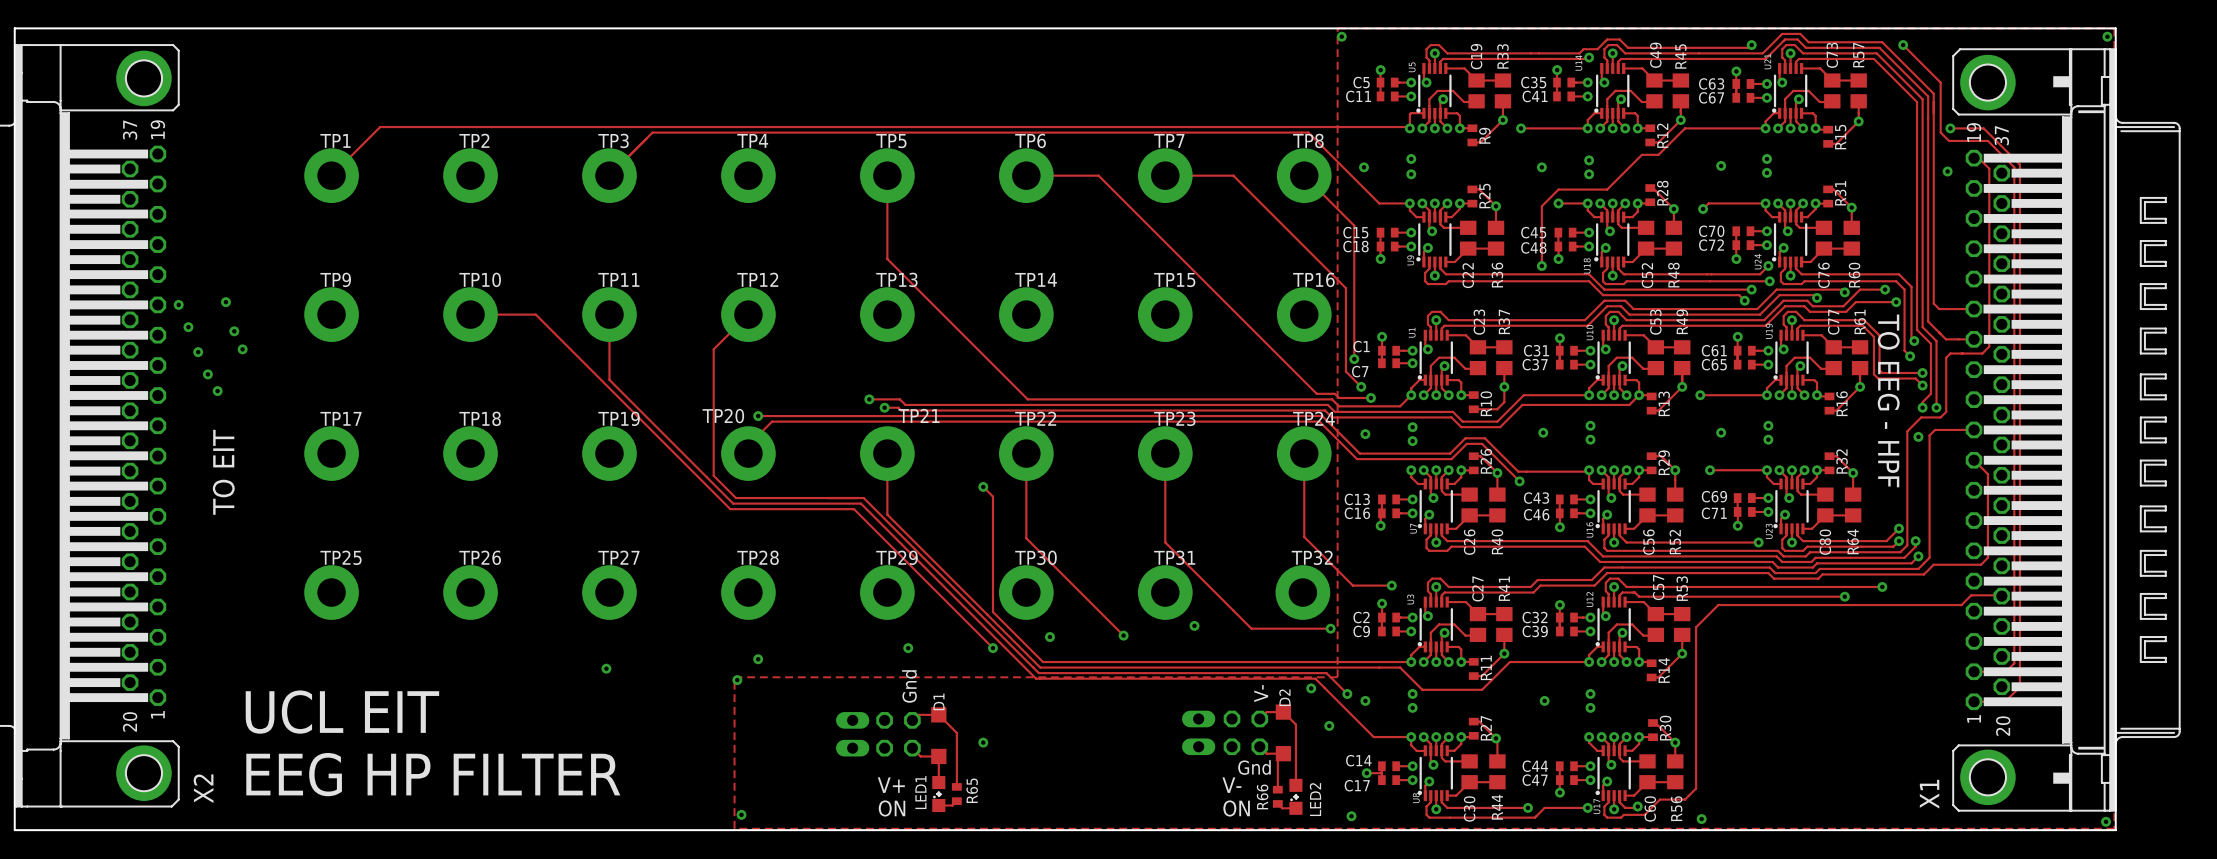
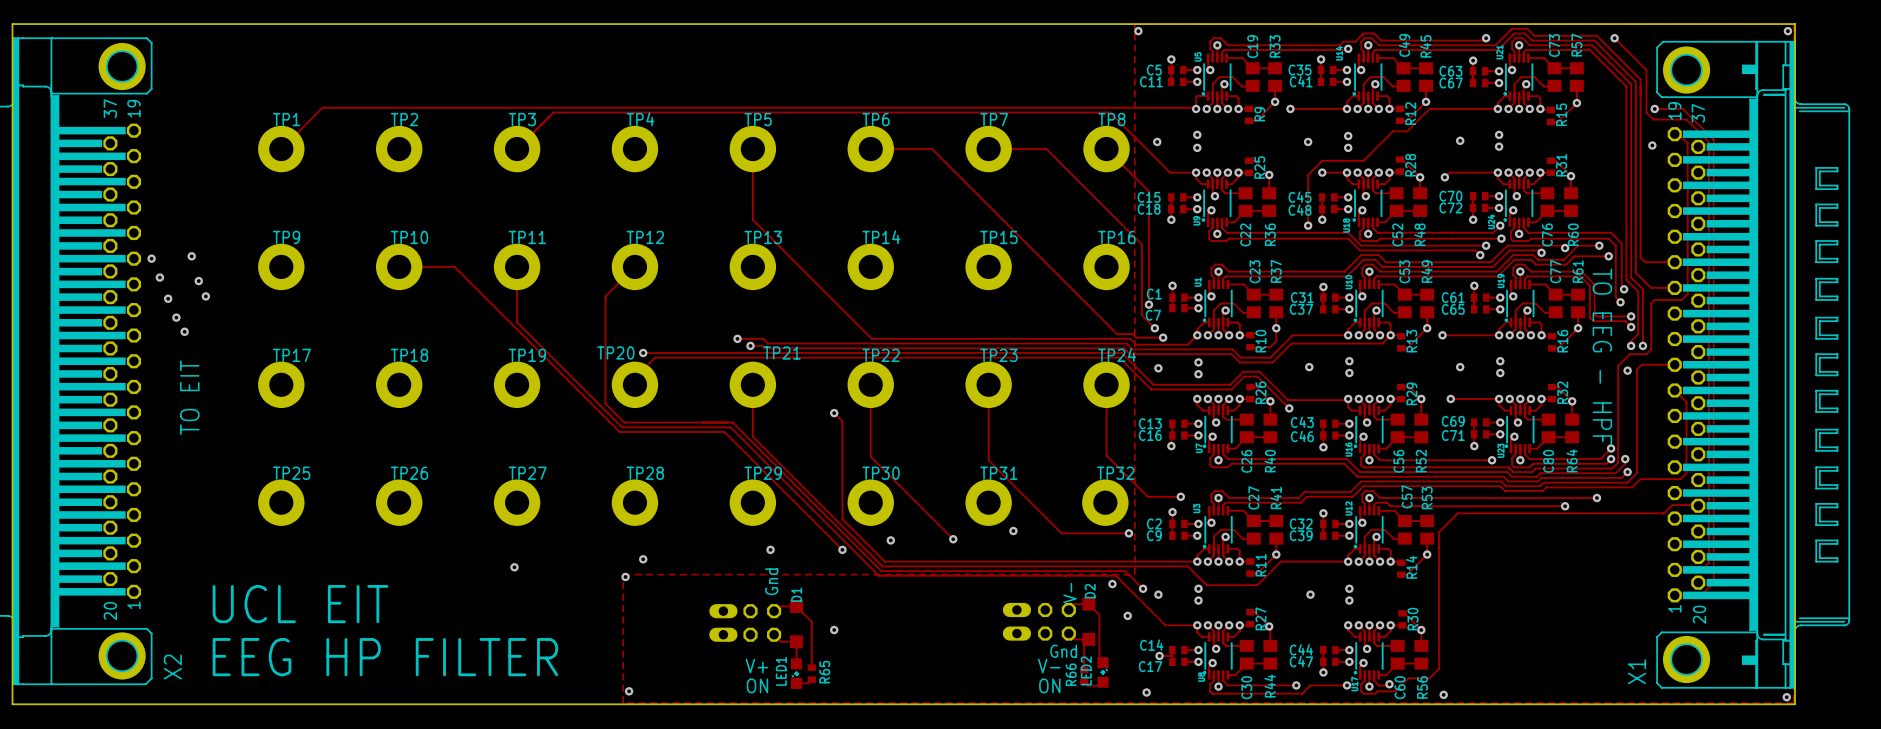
LED2 rotation: 0° (1295, 796) -> 180° (1102, 672)

